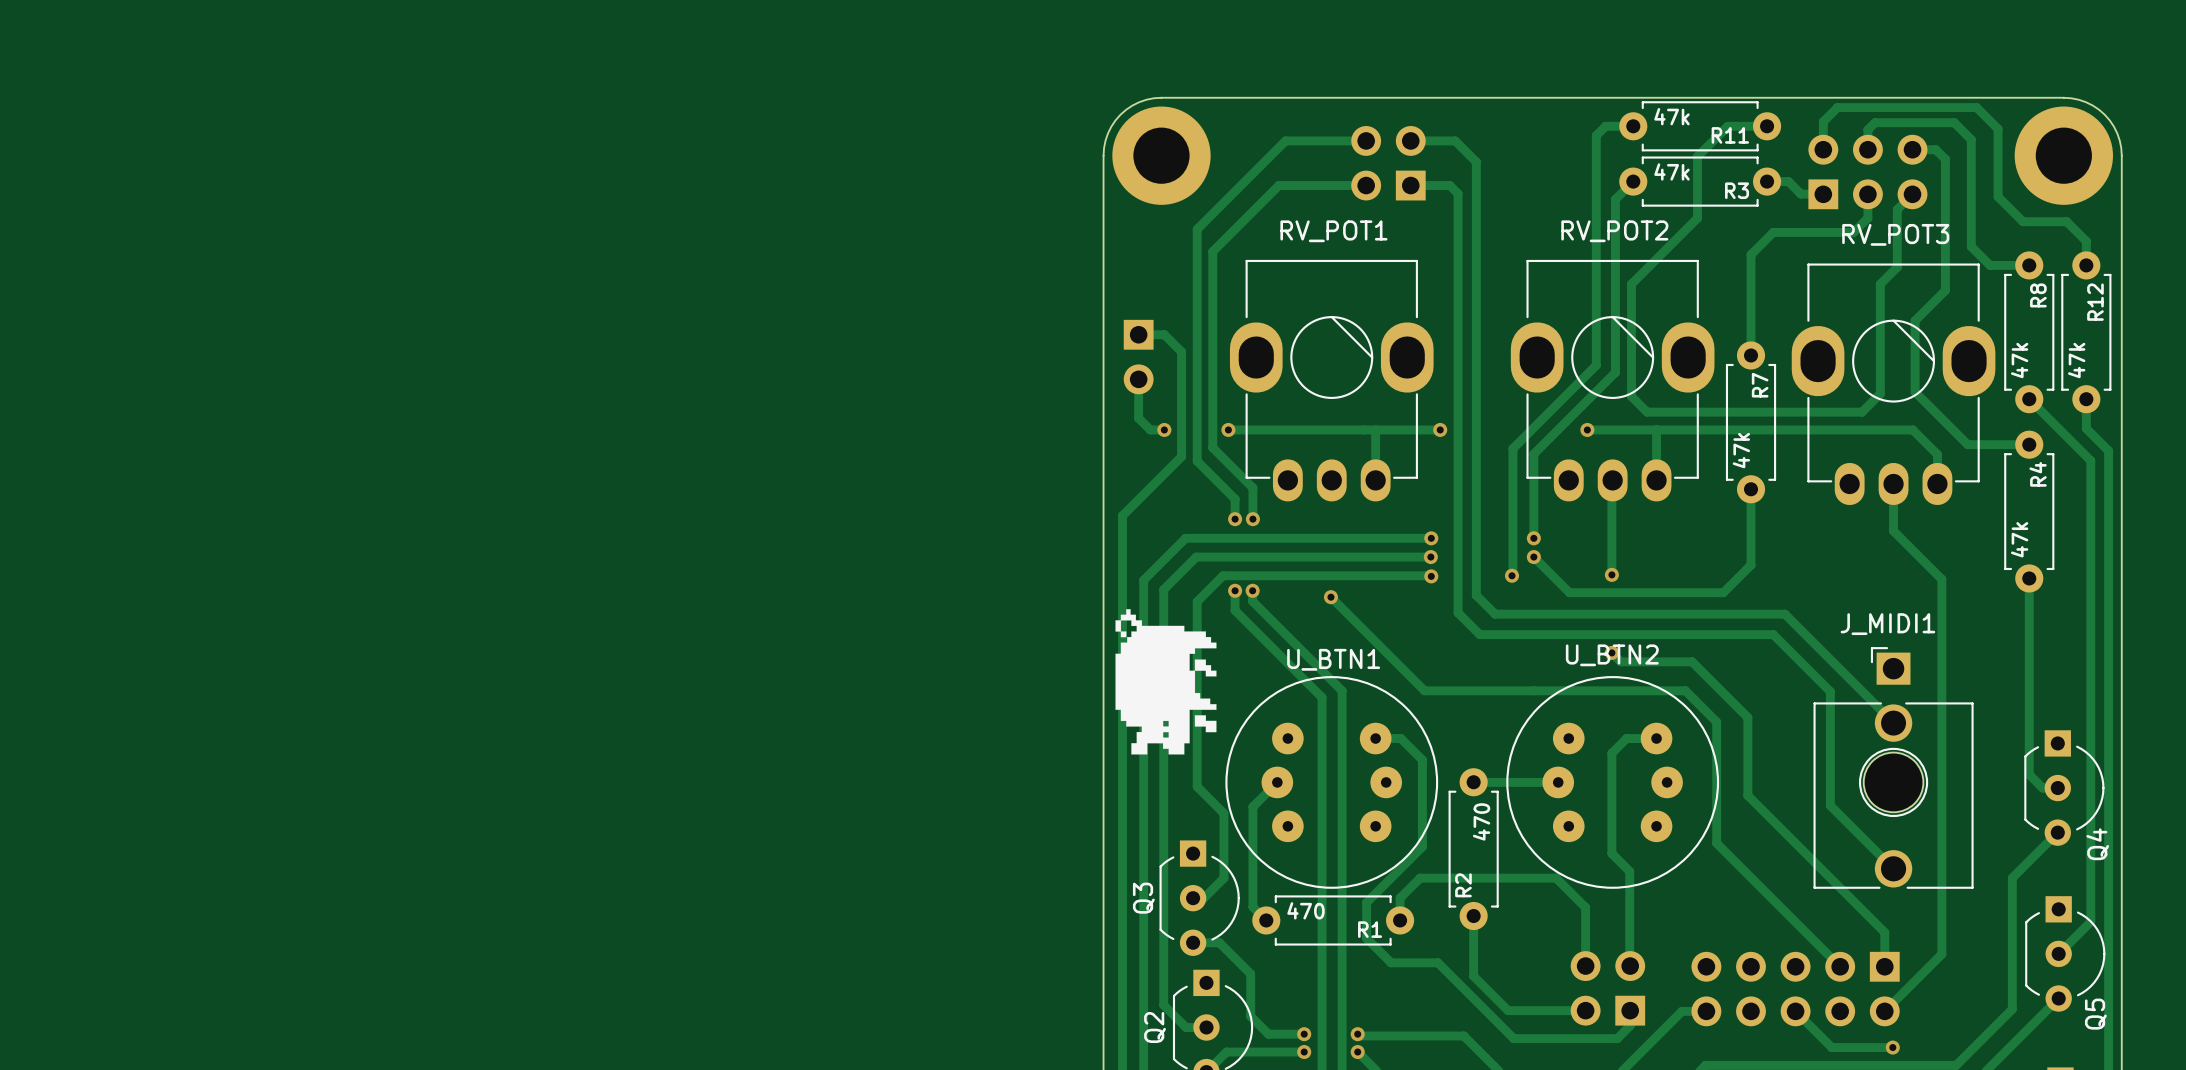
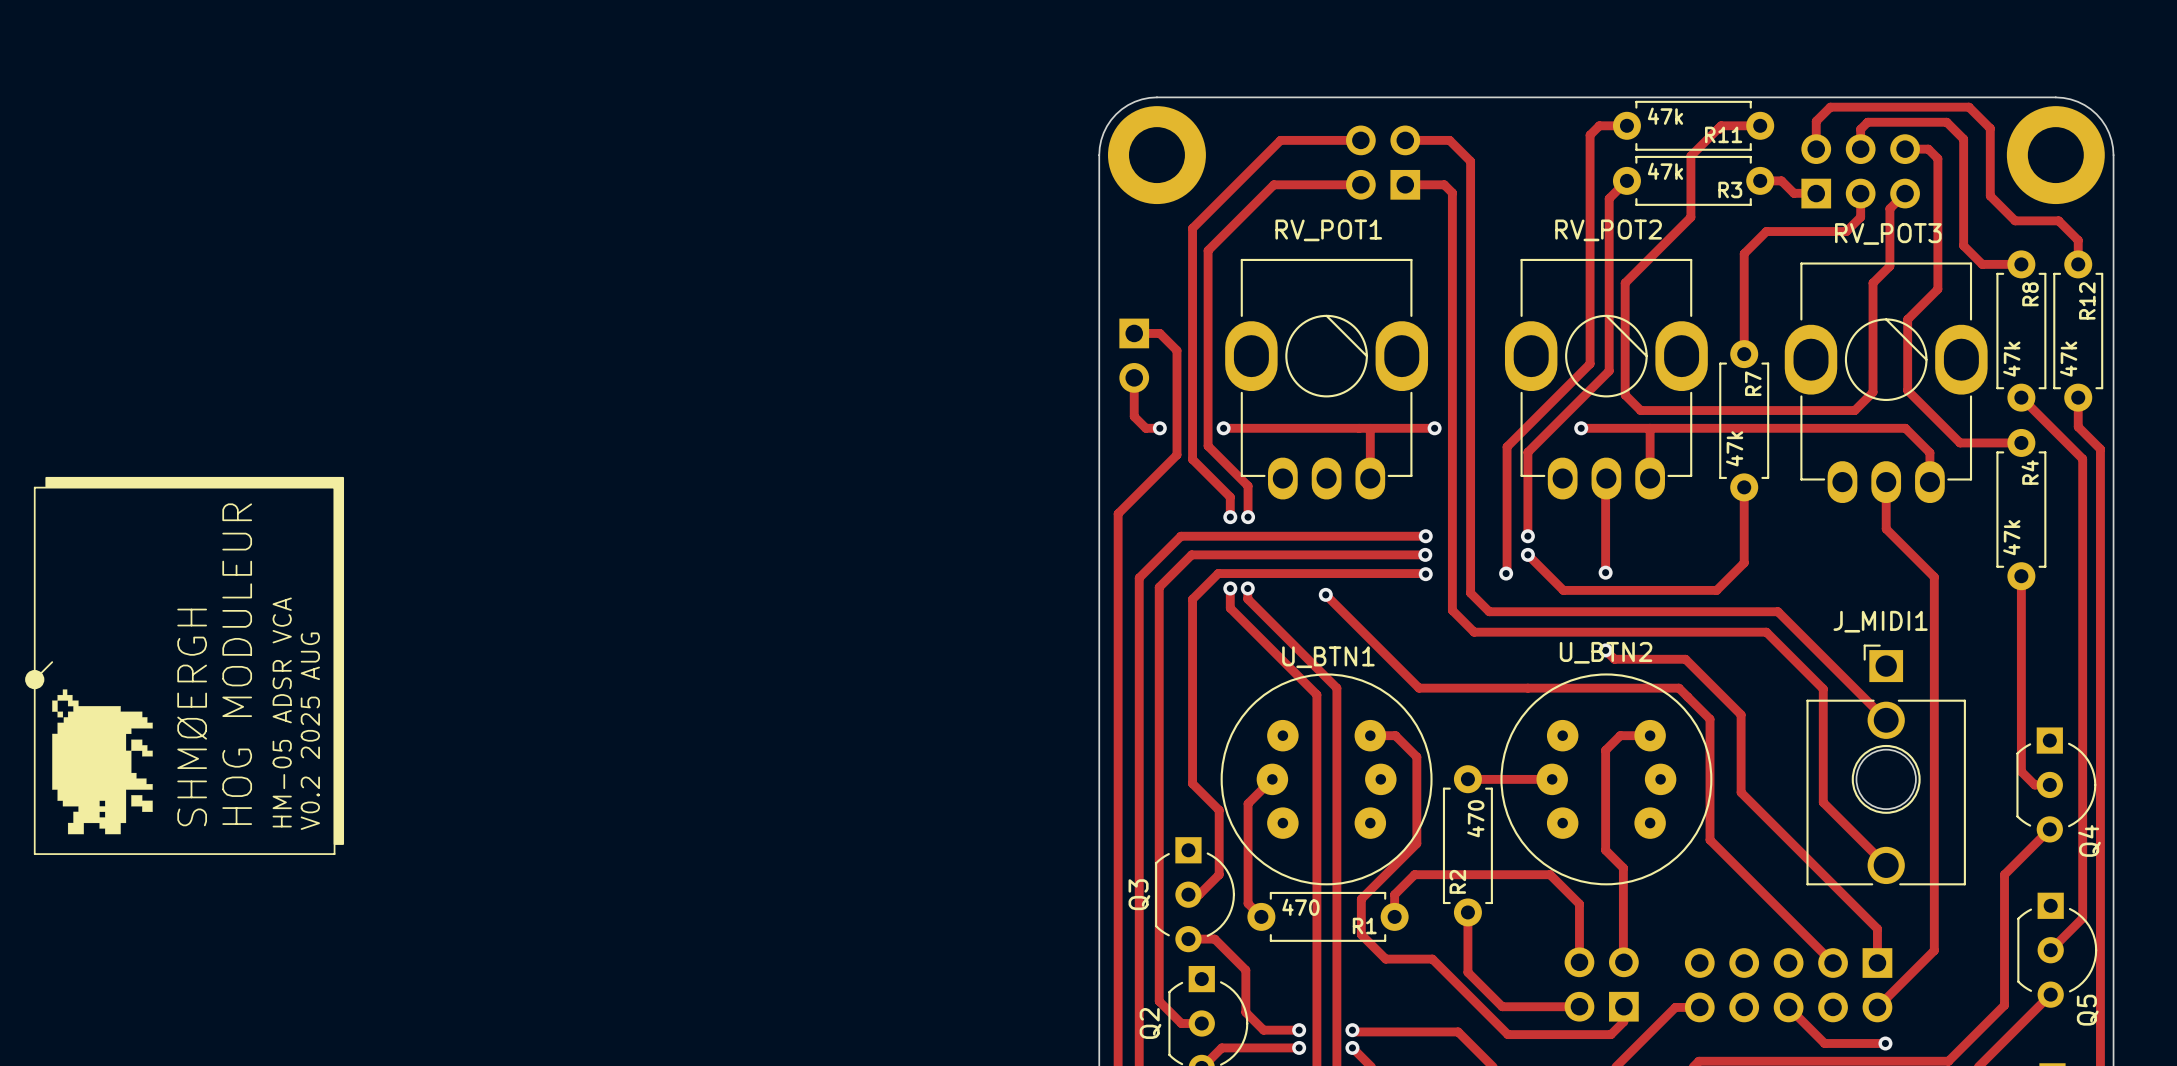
drawing: none -> [45, 476, 345, 845]
line: none -> (34, 487) (334, 487) (334, 854) (34, 854) (34, 487)
drawing: [1115, 609, 1217, 755] -> none
line: none -> (52, 662) (34, 679)
text: none -> HOG MODULEUR (237, 664)
drawing: none -> [25, 669, 153, 835]
text: none -> HM-05 ADSR VCA (282, 712)
text: none -> SHMØERGH (192, 717)
text: none -> V0.2 2025 AUG (310, 731)

